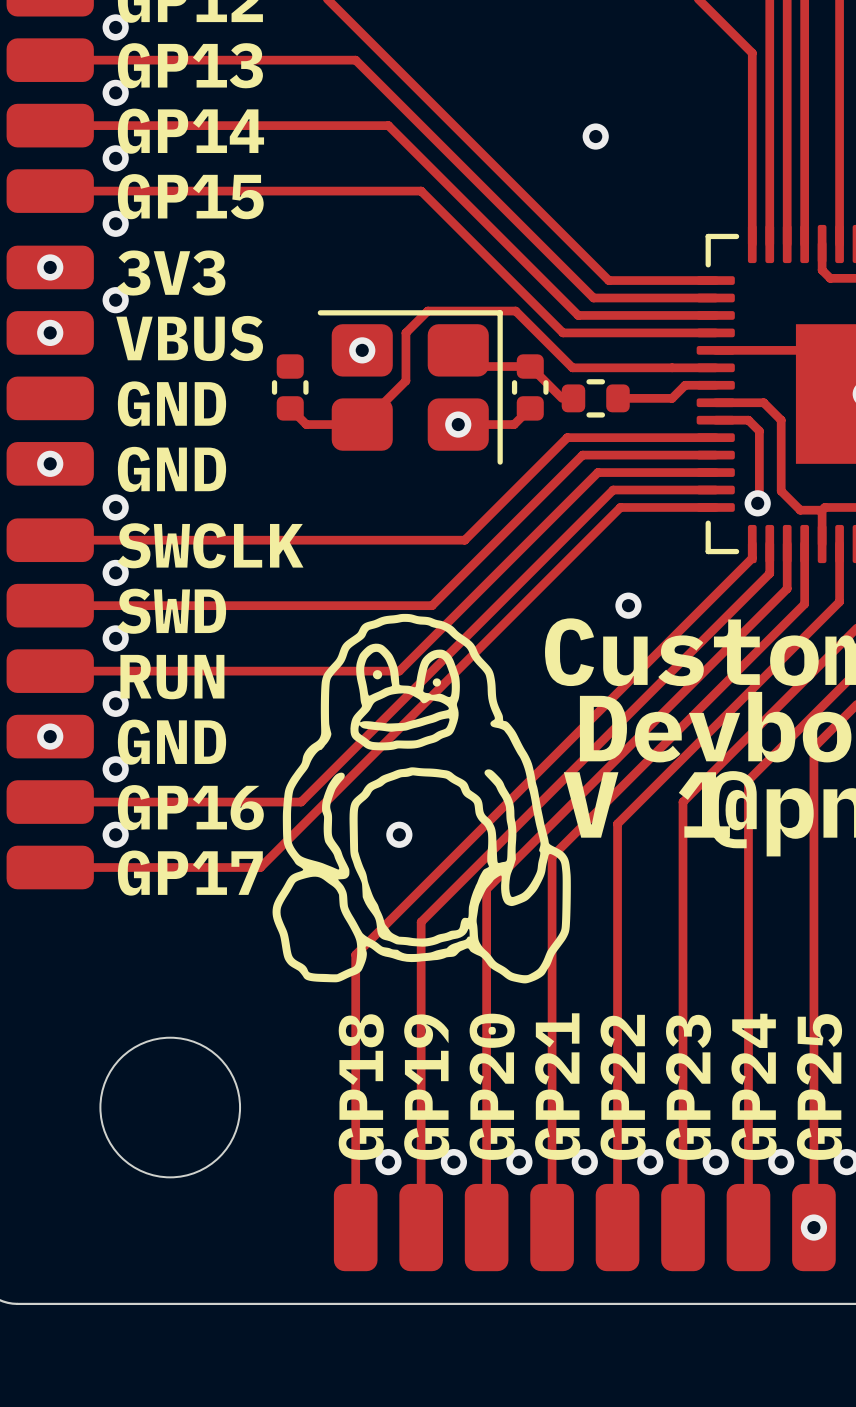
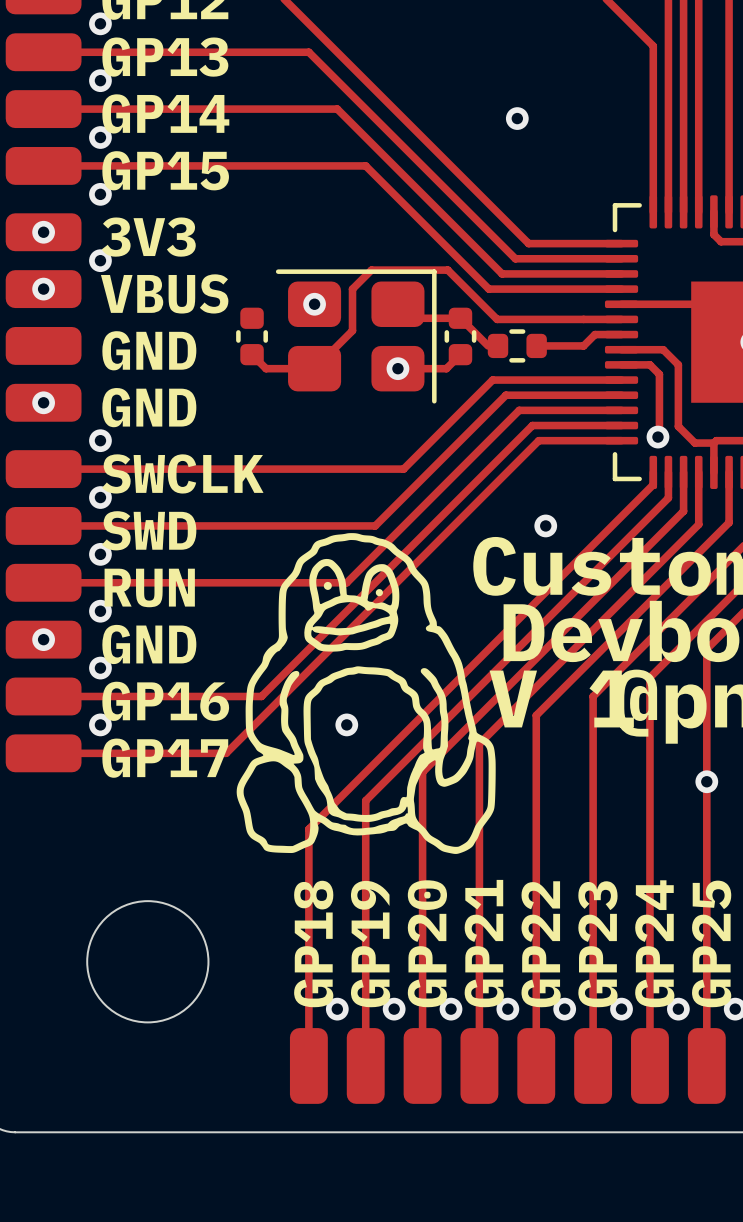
via: none -> (706, 781)
via: (813, 1227) -> none

